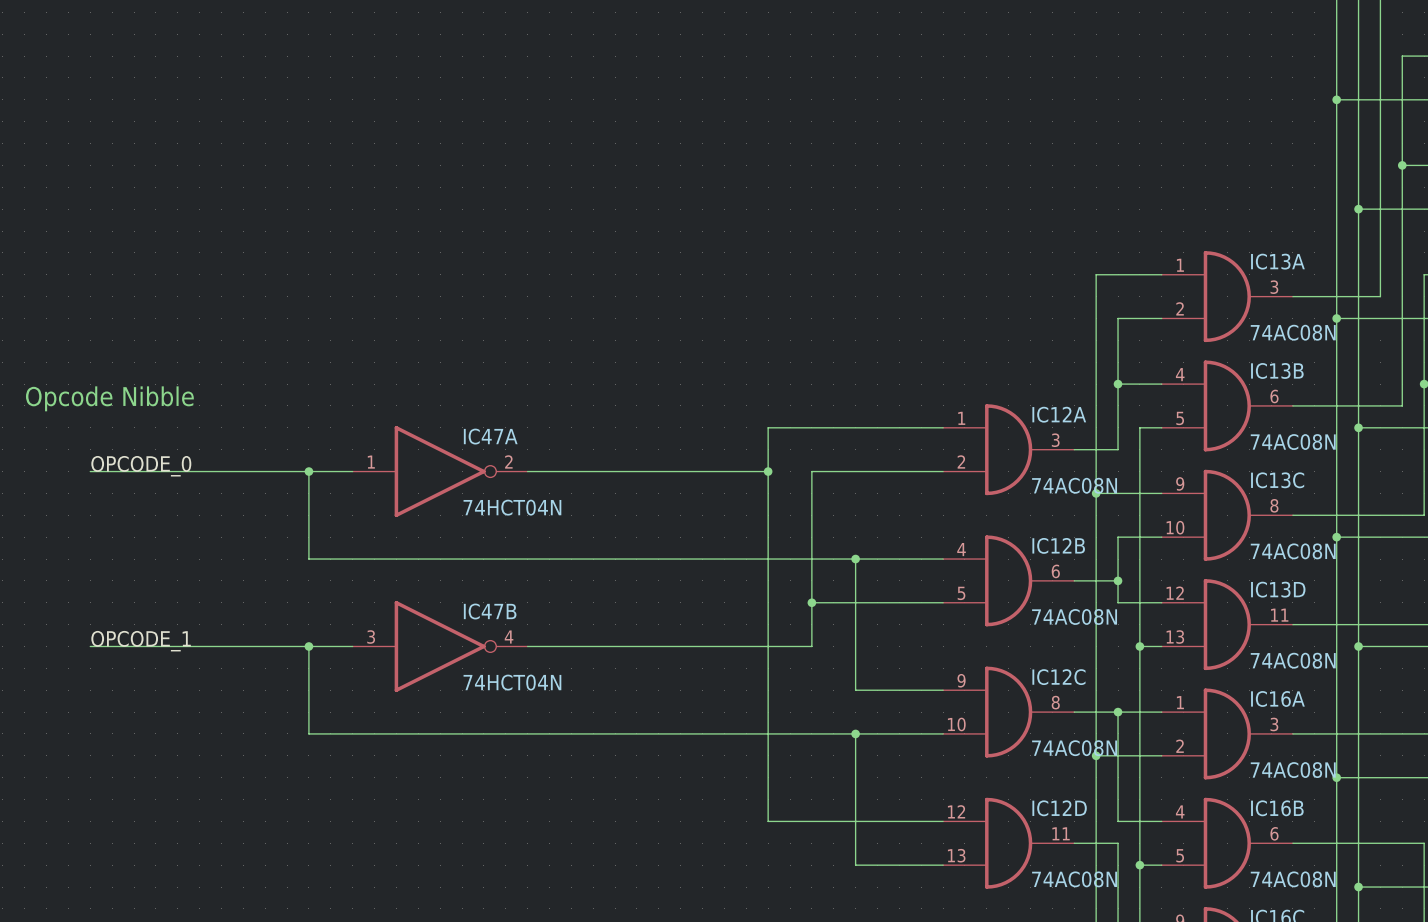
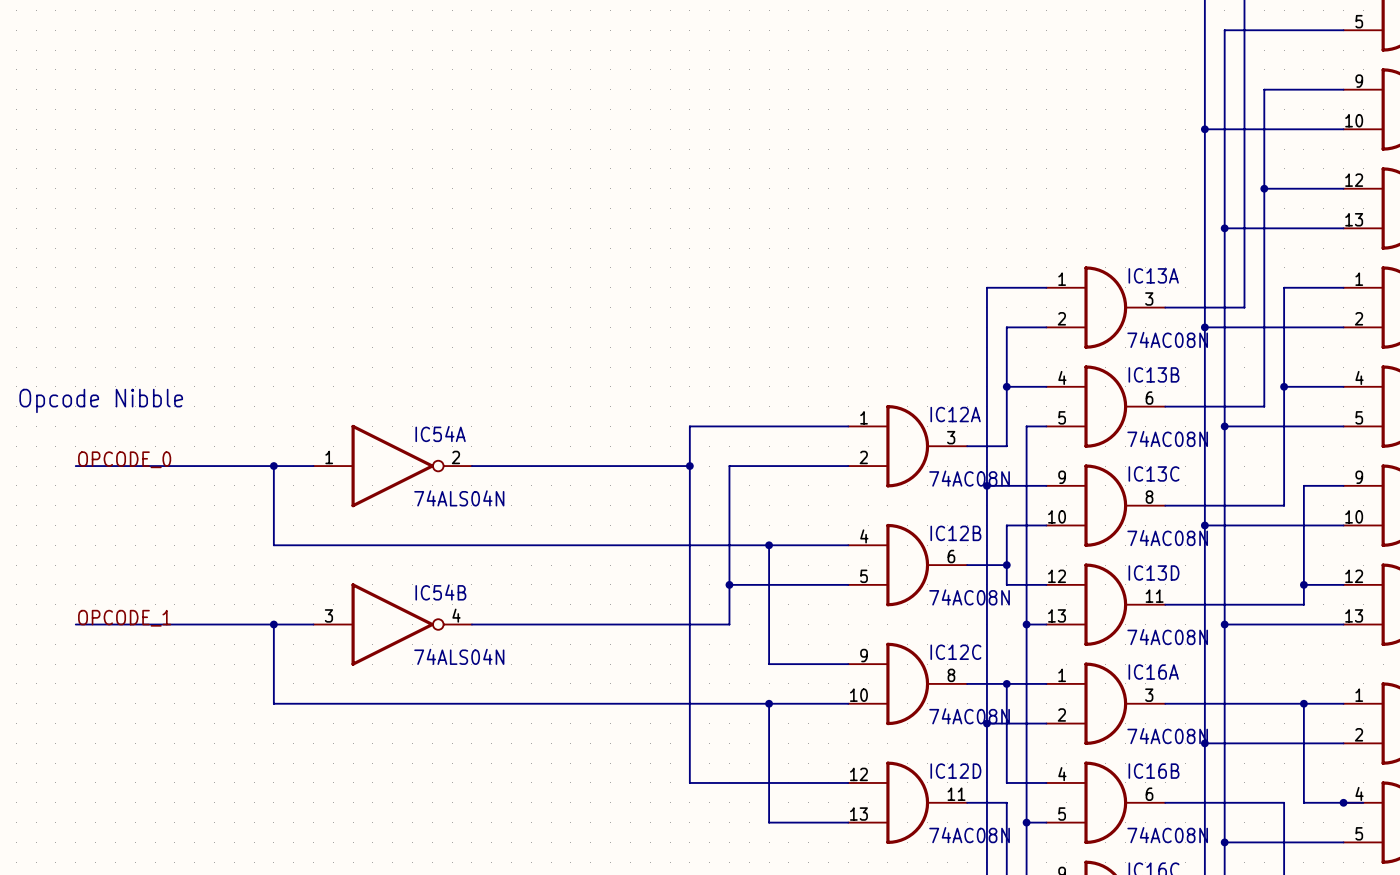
IC47A name: IC47A (490, 436) -> IC54A (440, 434)
IC47A value: 74HCT04N (512, 507) -> 74ALS04N (459, 498)
IC47B name: IC47B (490, 611) -> IC54B (440, 592)
IC47B value: 74HCT04N (512, 682) -> 74ALS04N (459, 656)

